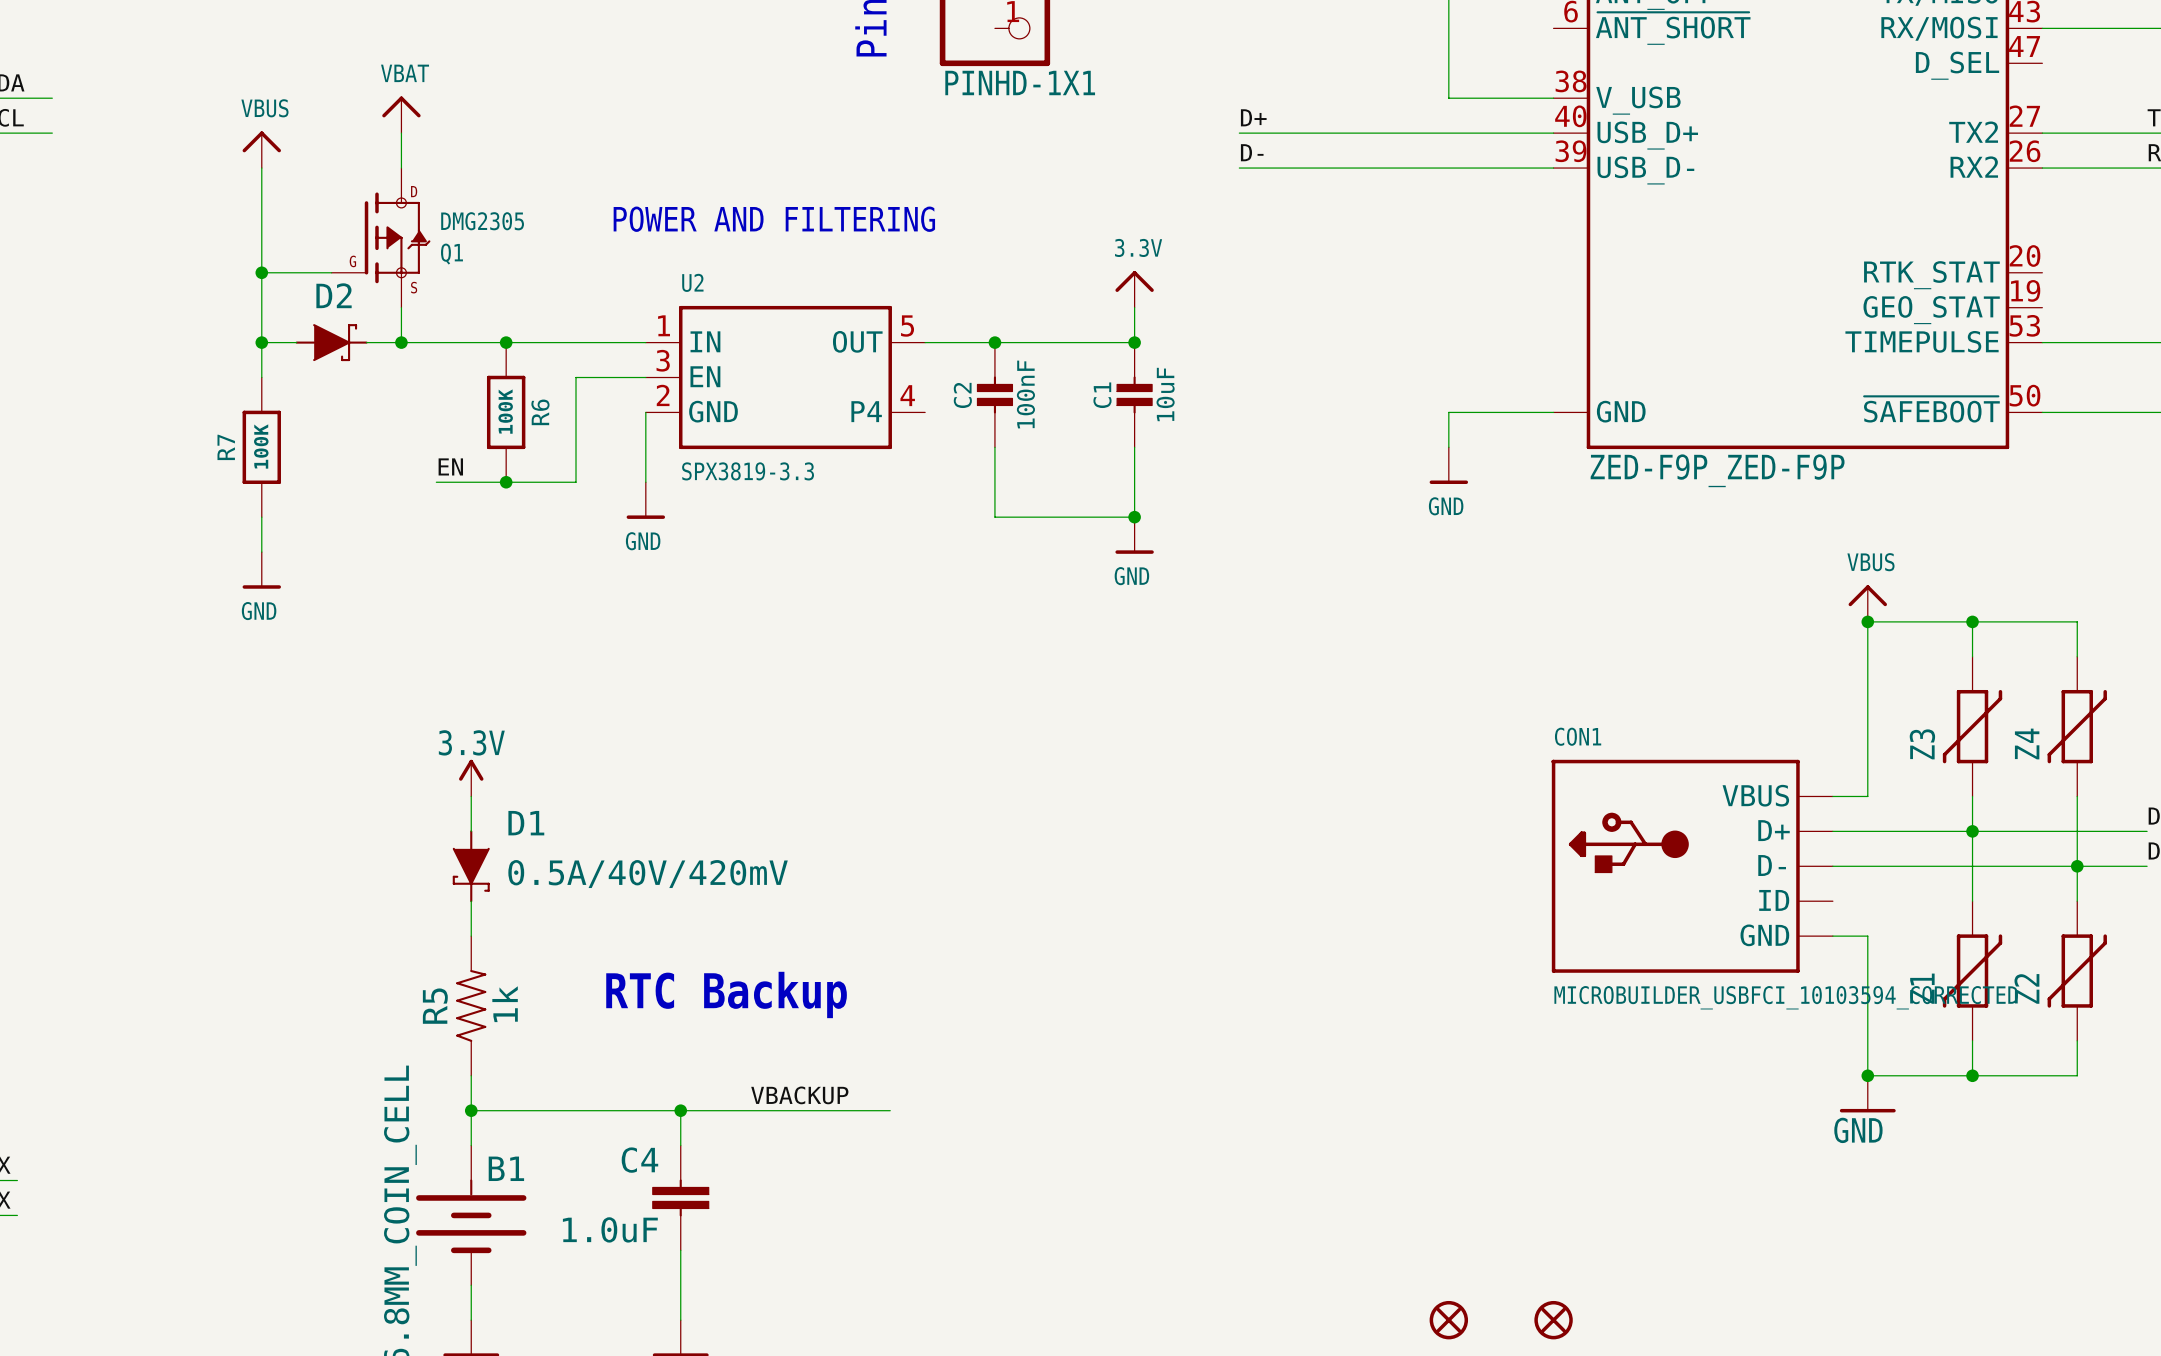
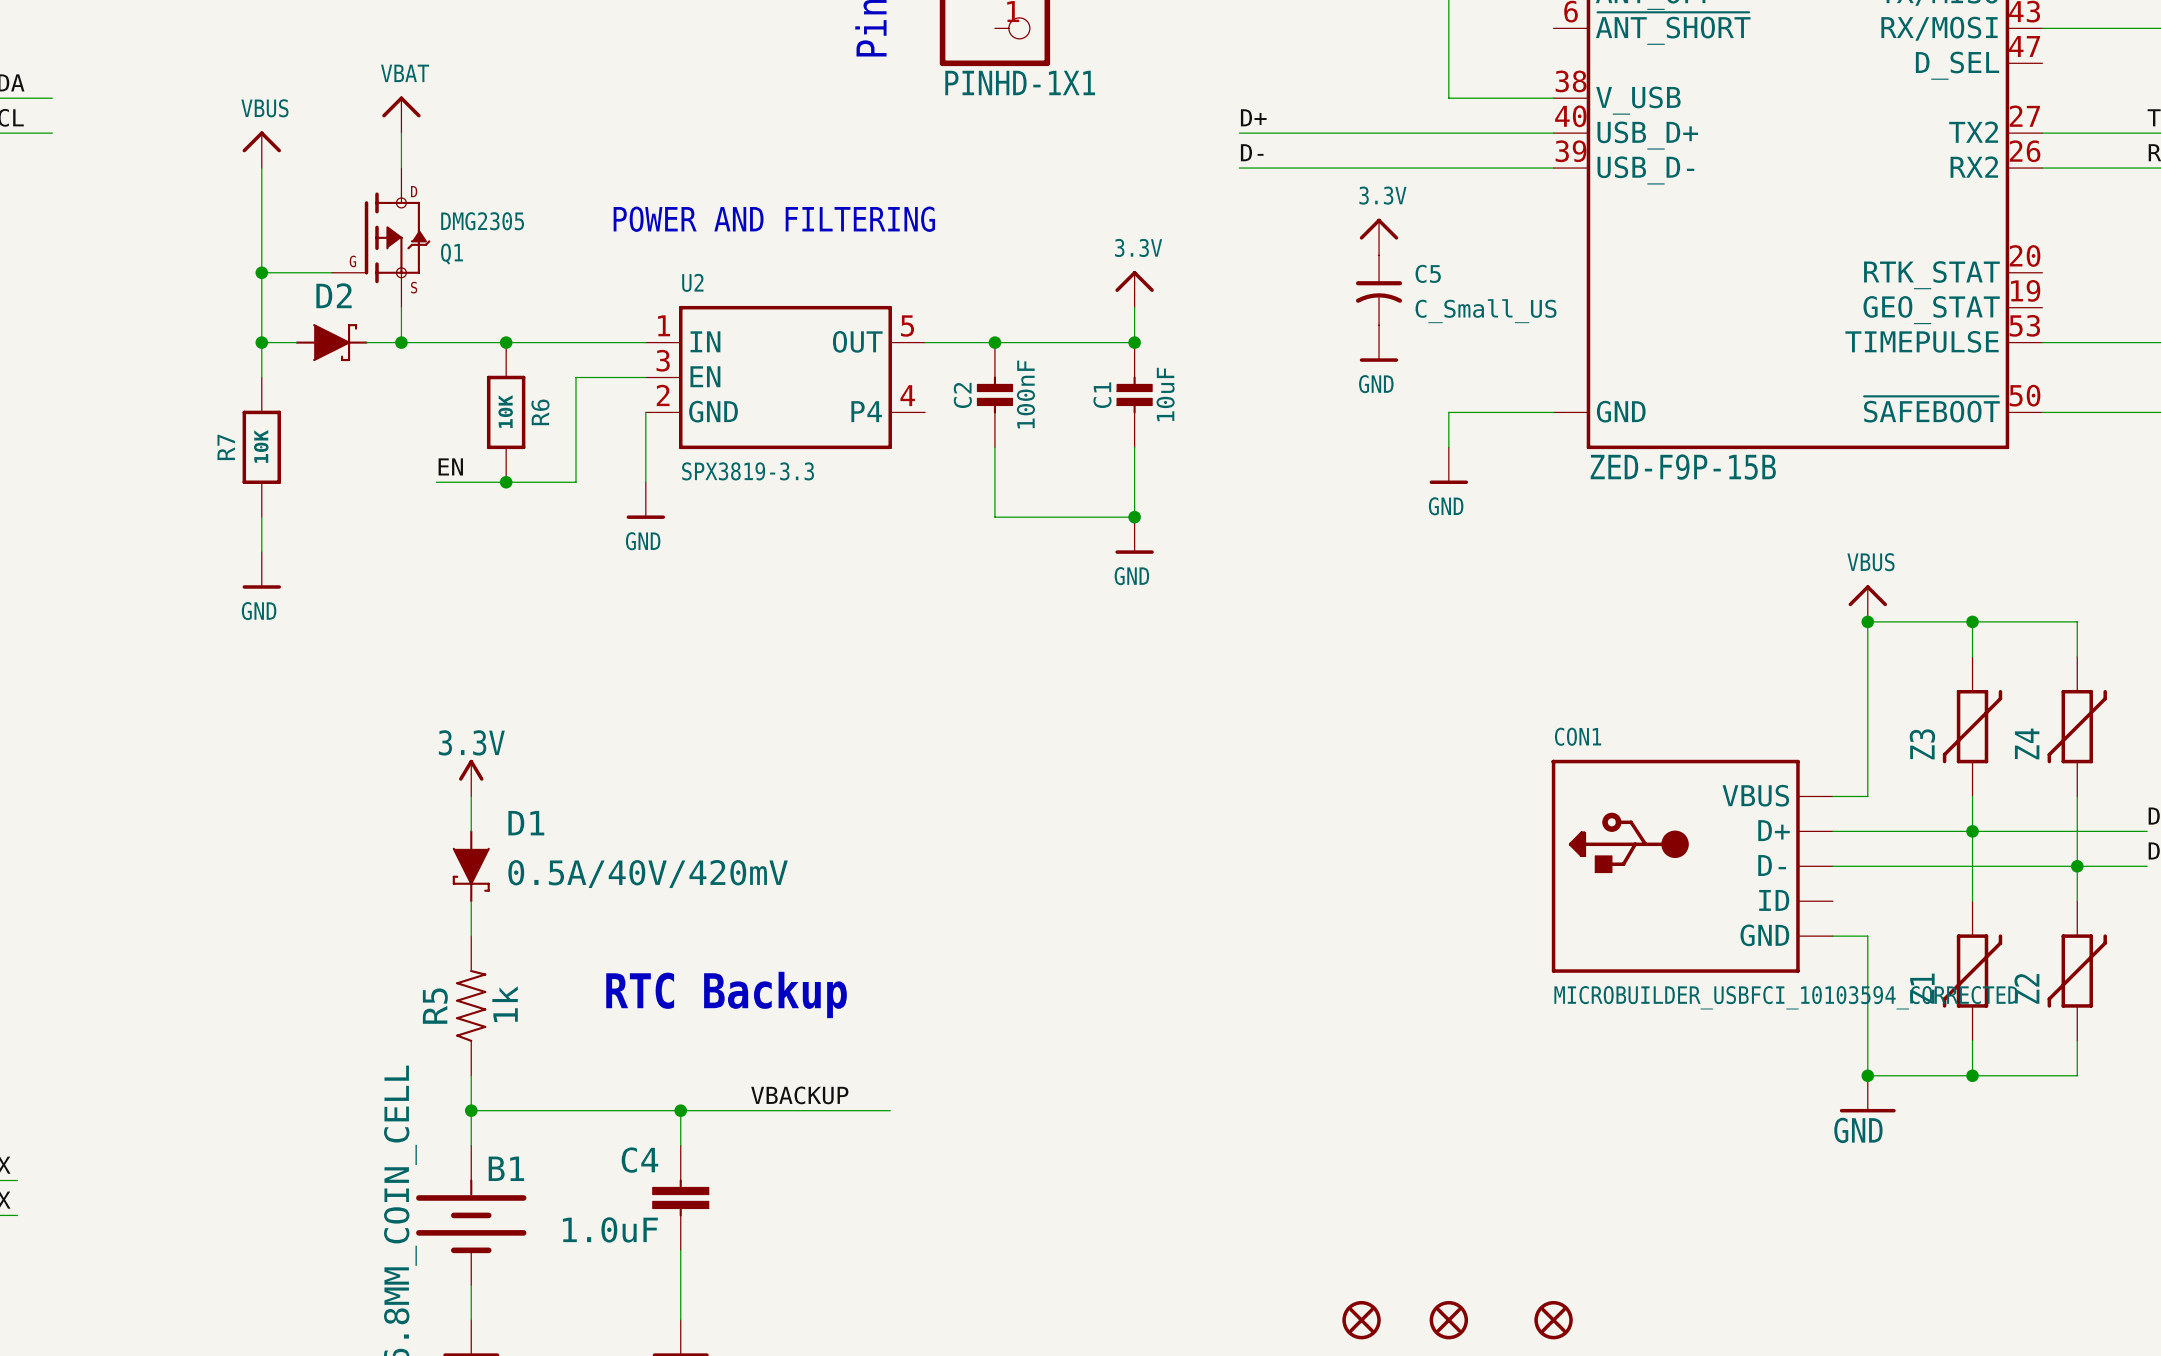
power symbol: none -> 3.3V (1379, 236)
C5: none -> C_Small_US (1379, 290)
power symbol: none -> GND (1379, 343)
R6 value: 100K (505, 411) -> 10K (505, 411)
R7 value: 100K (261, 446) -> 10K (261, 446)
part value: ZED-F9P_ZED-F9P (1717, 470) -> ZED-F9P-15B (1683, 467)
part: none -> (1361, 1320)

